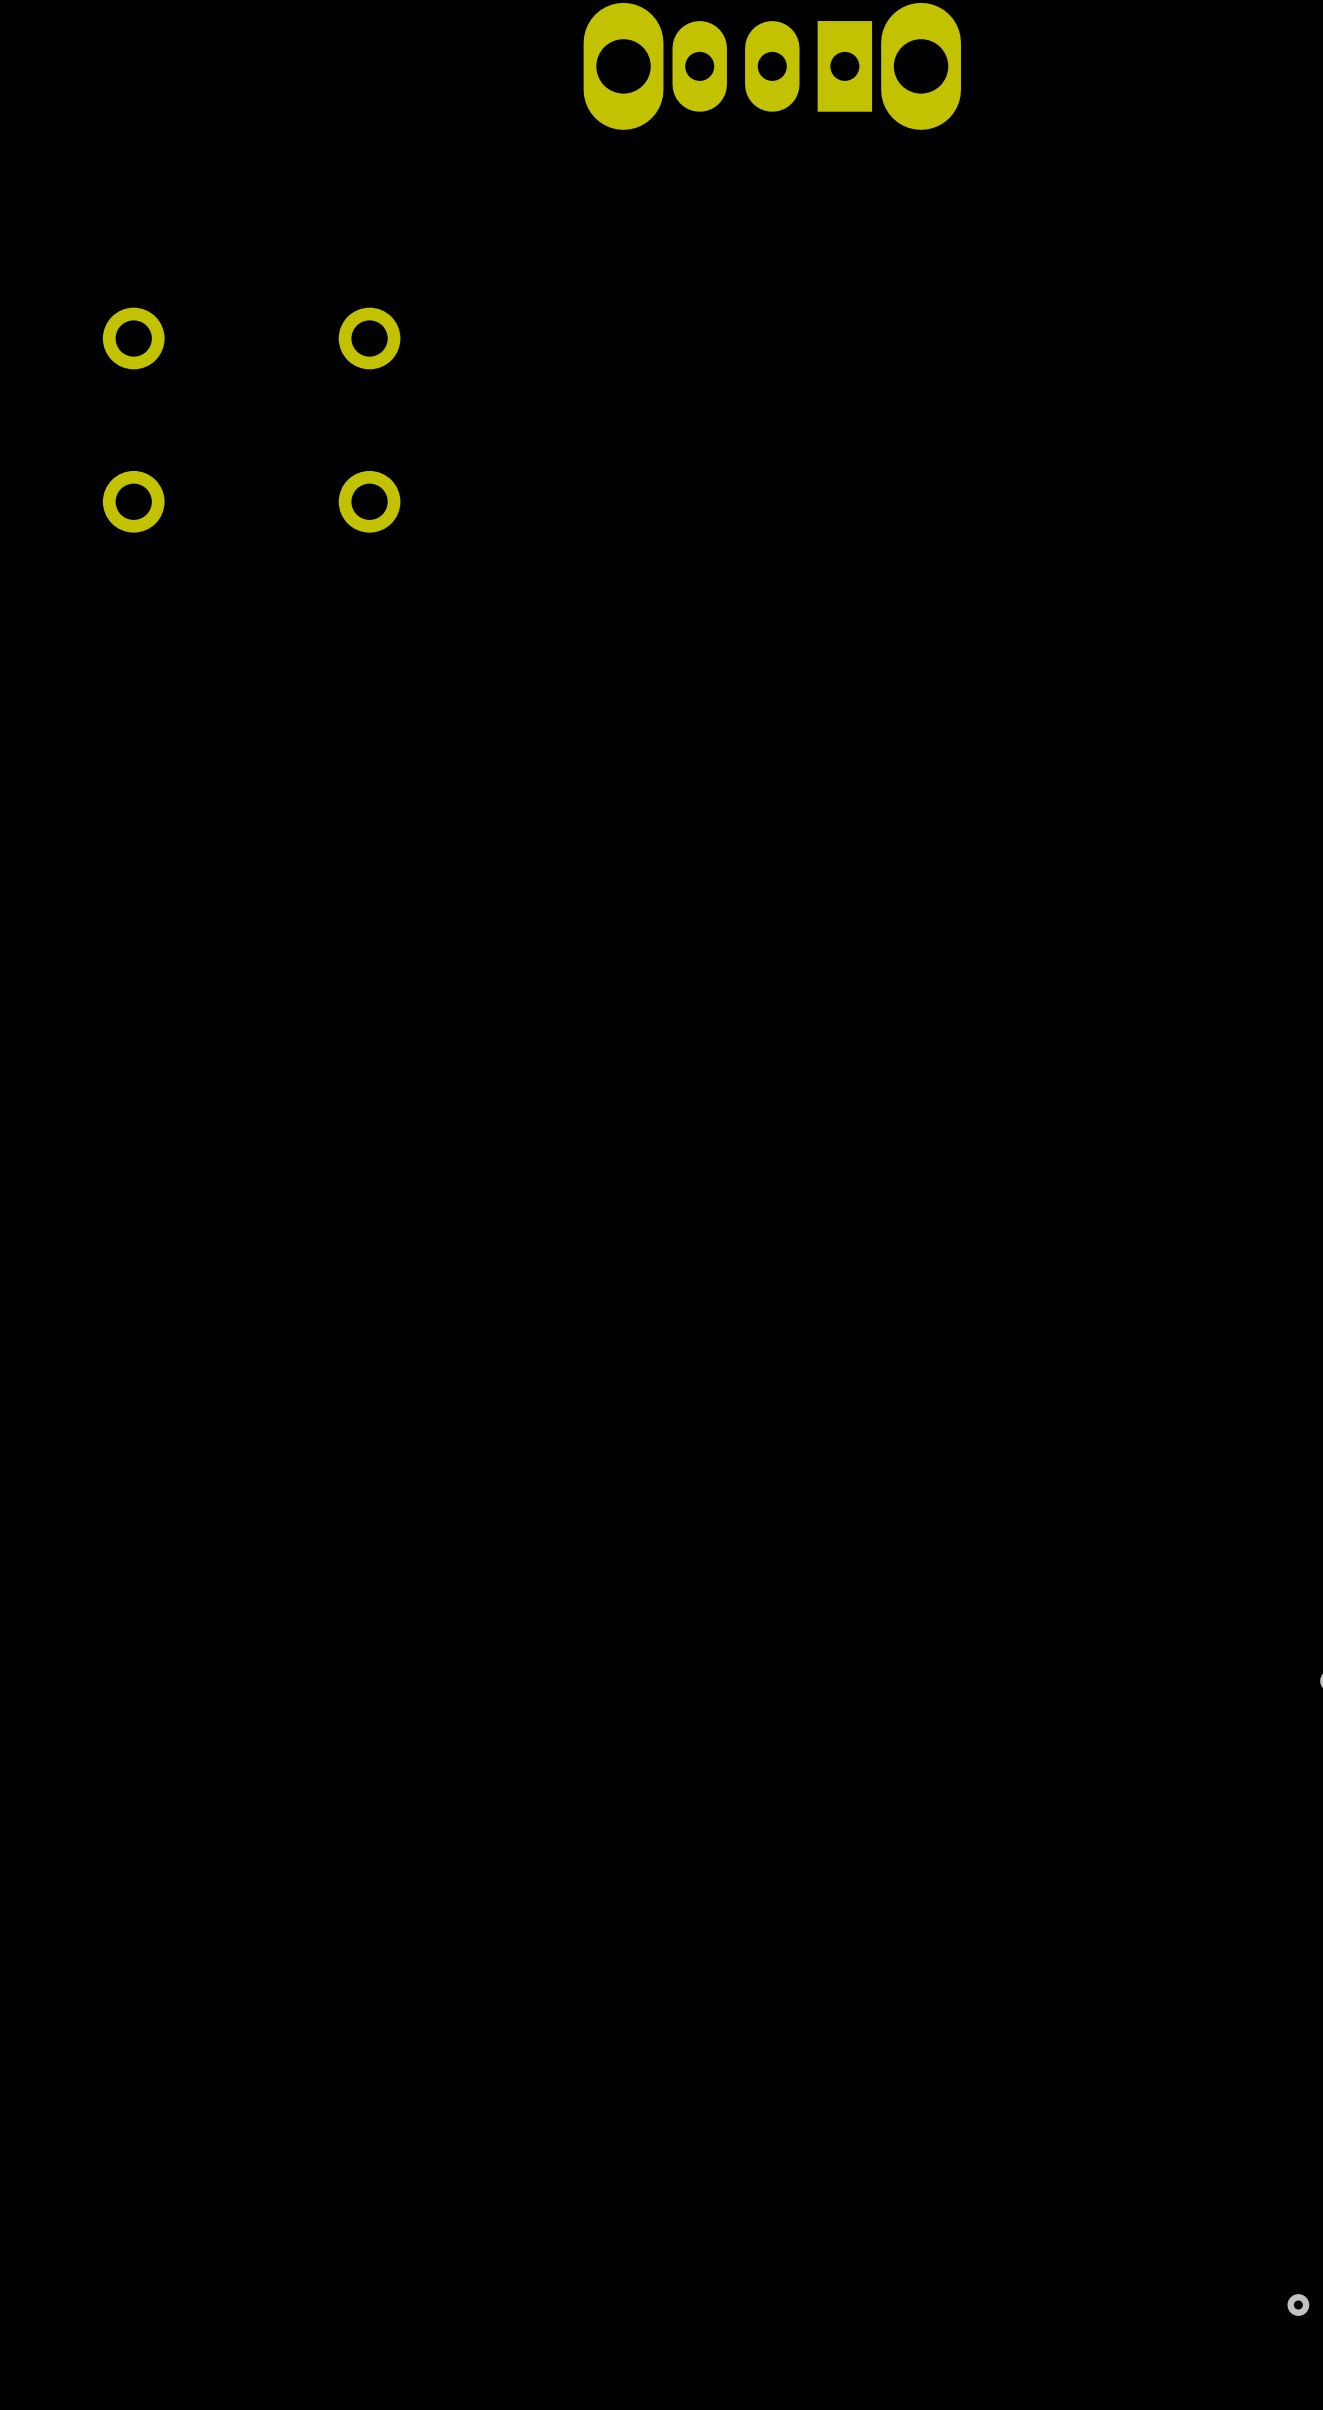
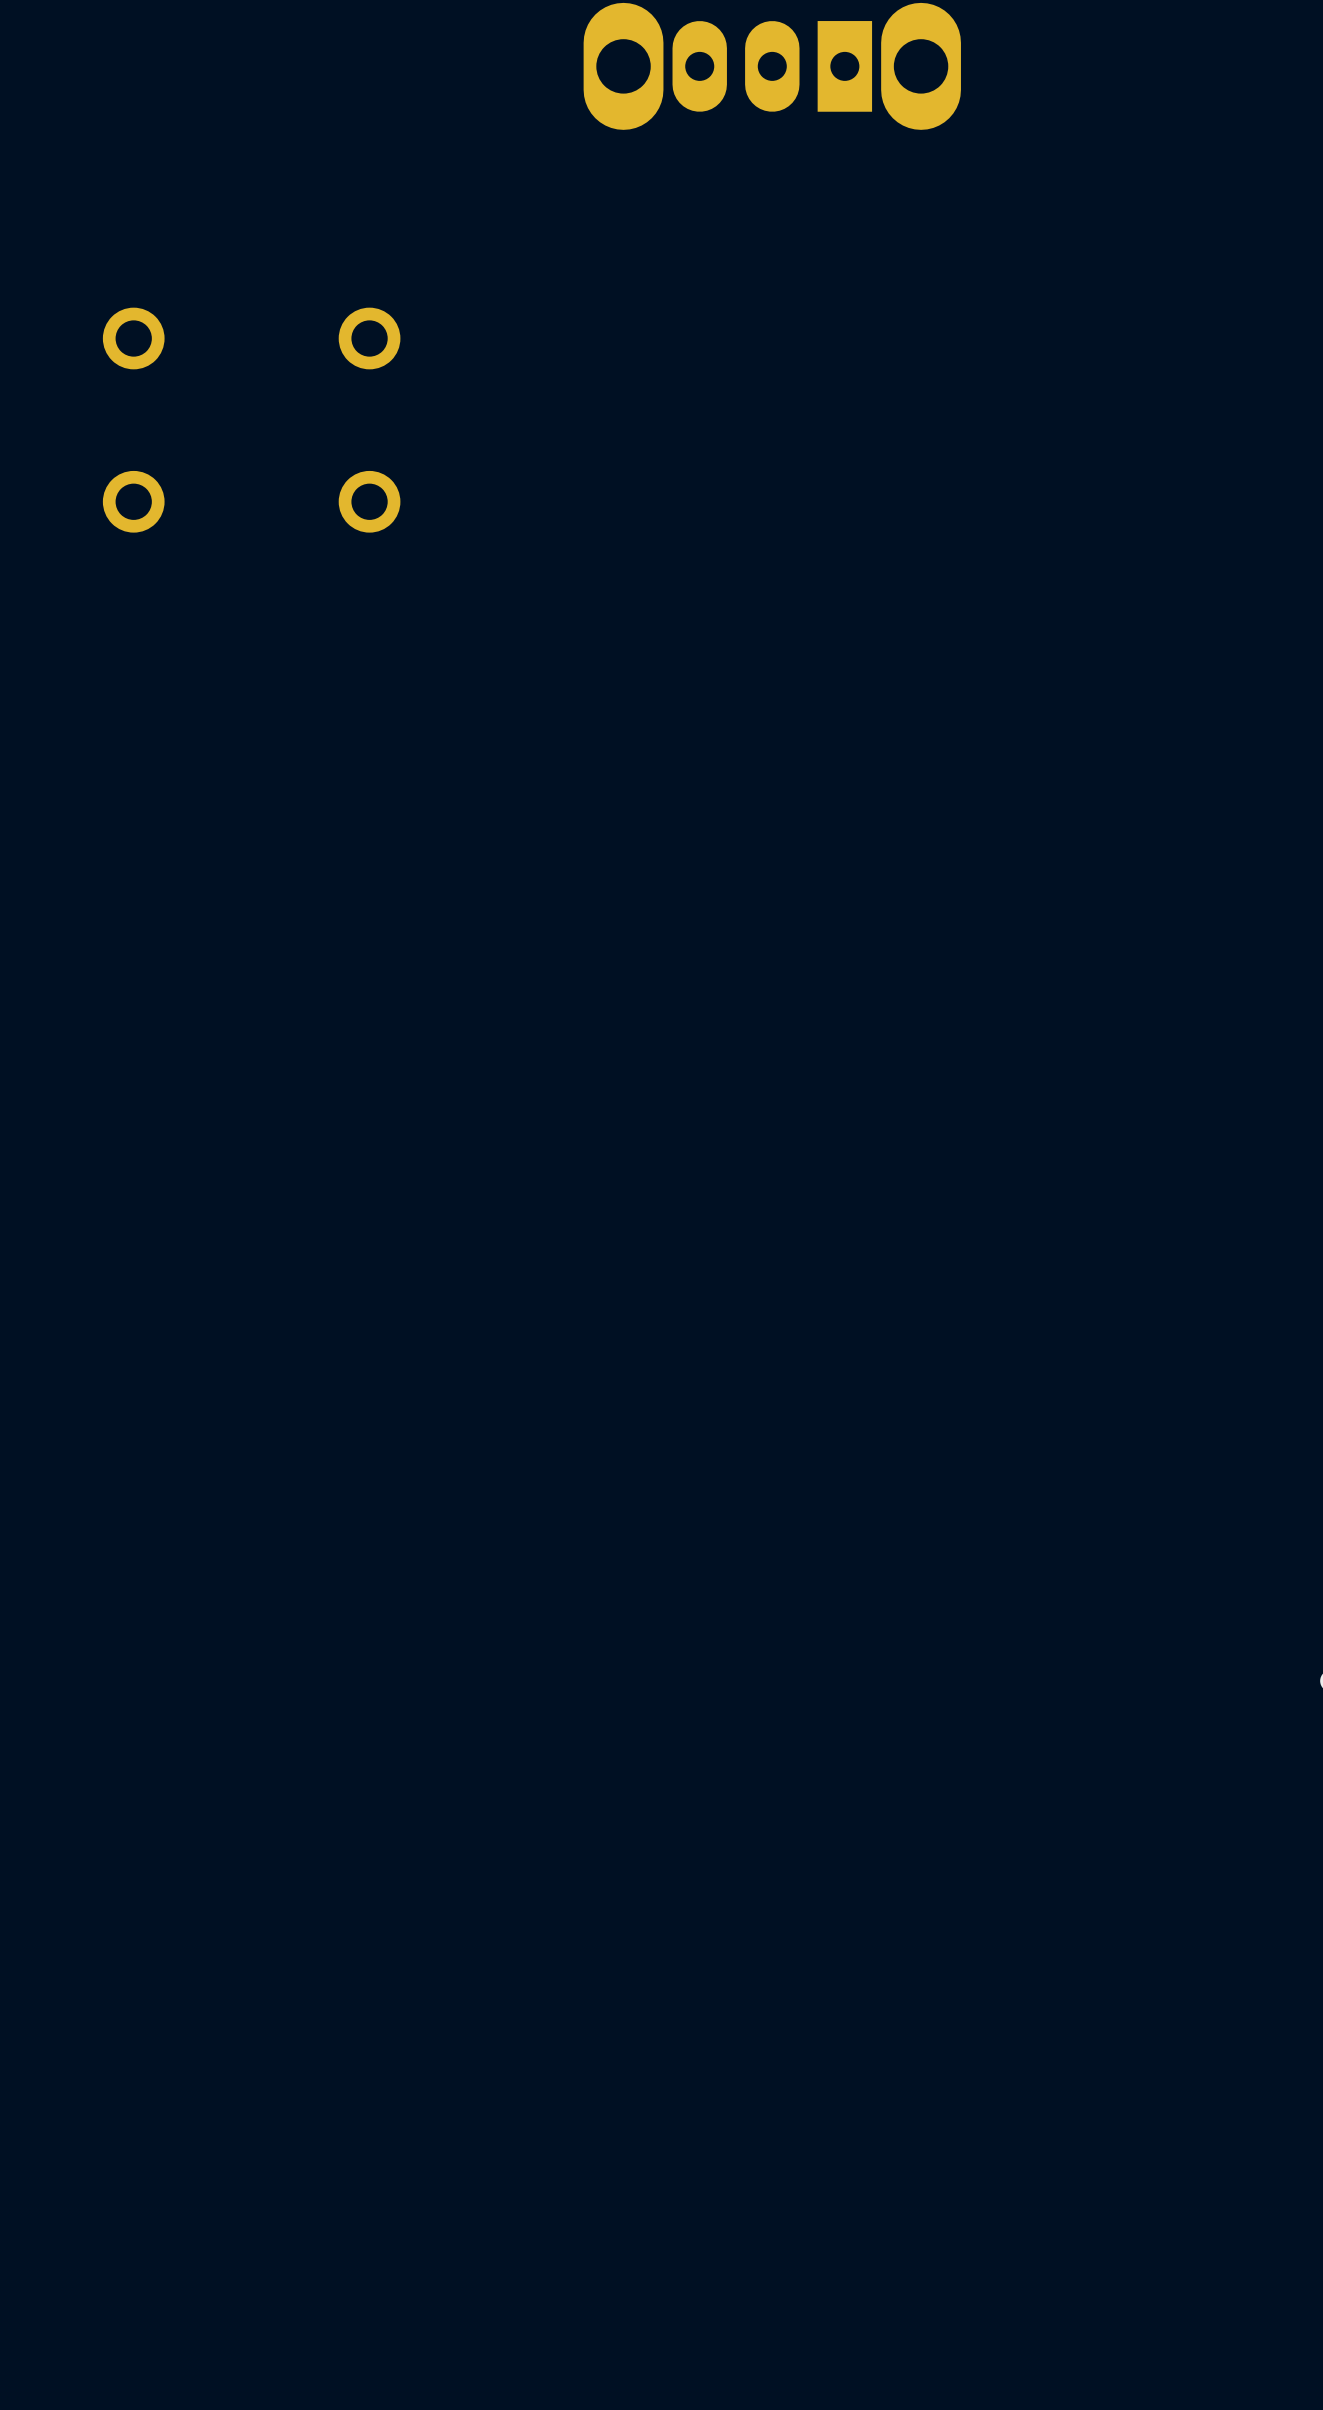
via: (1298, 2305) -> none

